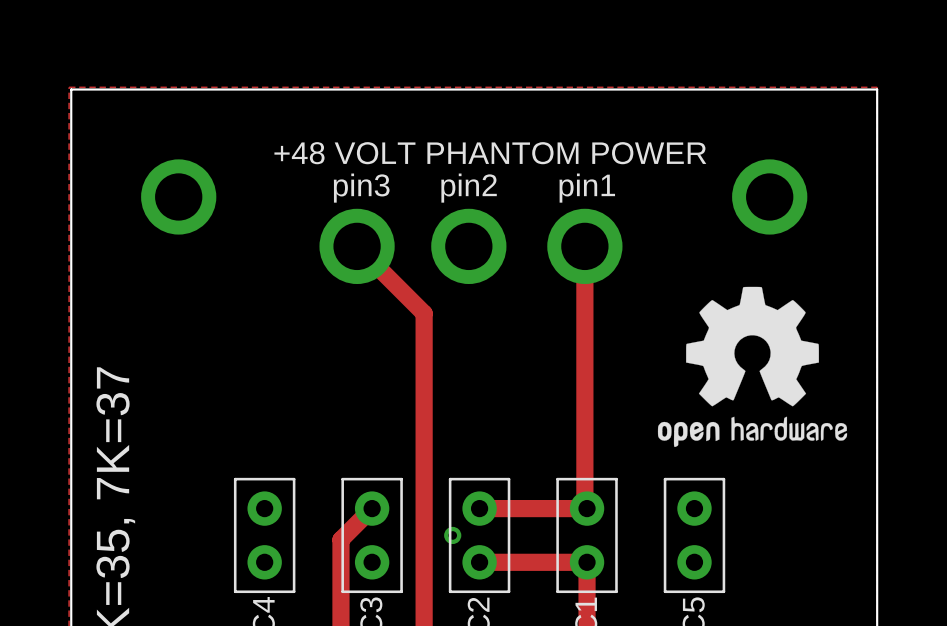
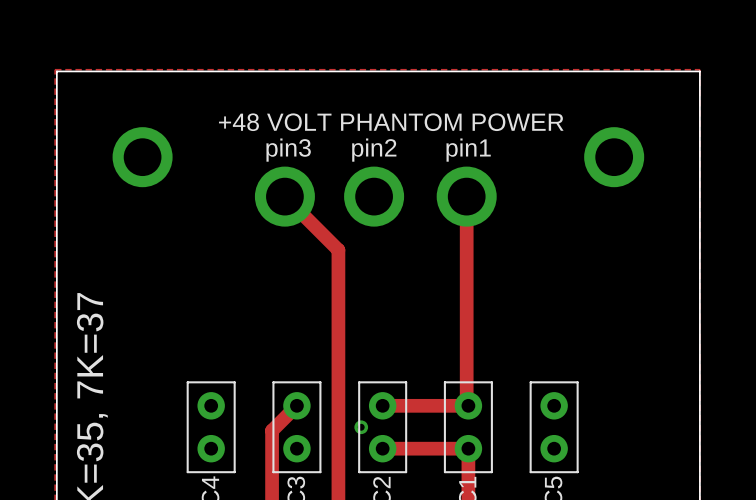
drawing: [657, 286, 848, 448] -> none

